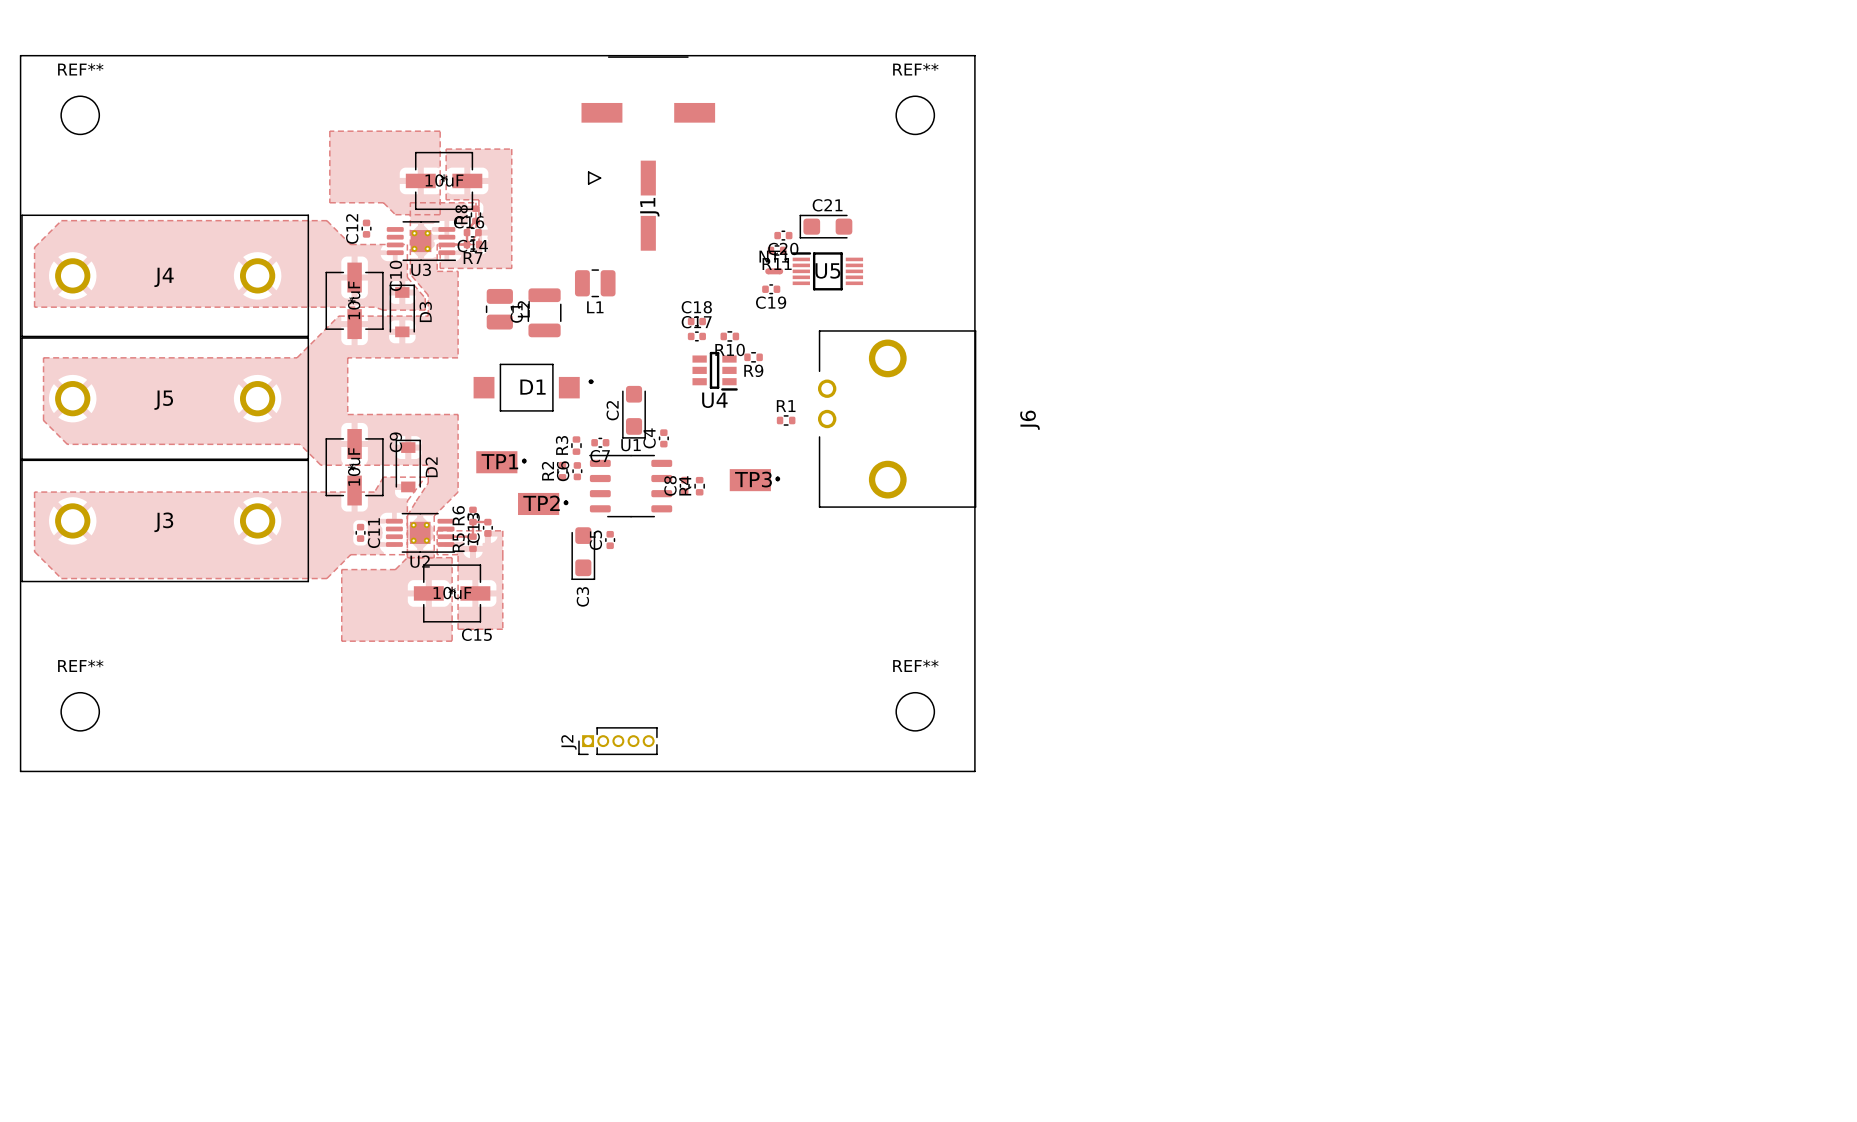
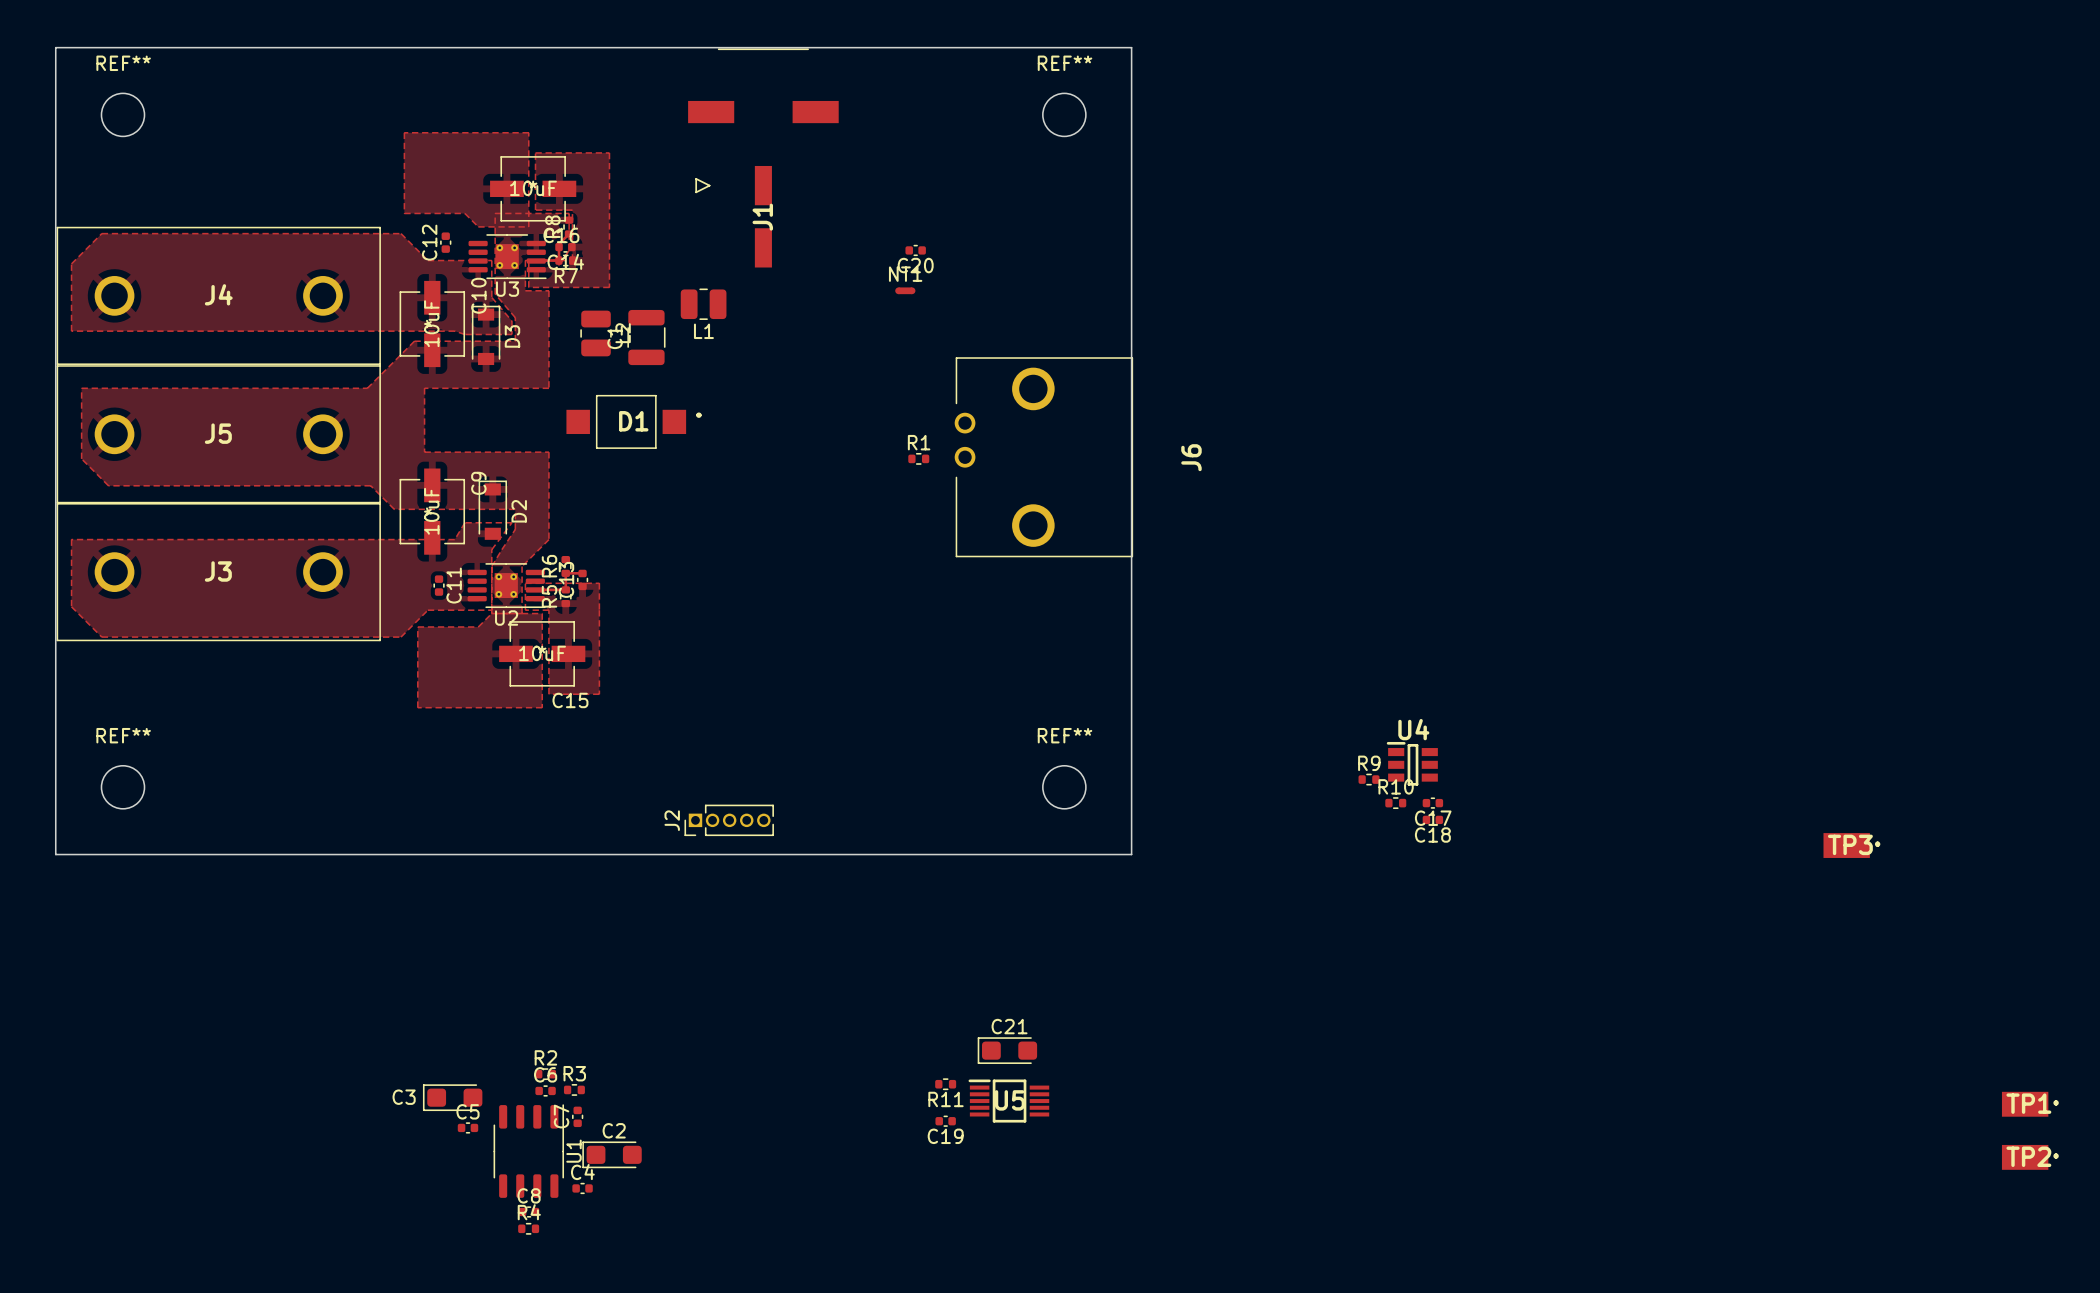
C21 position: (825, 226) -> (1007, 1050)
R11 position: (777, 250) -> (945, 1084)
U5 position: (827, 271) -> (1008, 1101)
C19 position: (771, 289) -> (945, 1121)
C18 name position: C18 (696, 307) -> C18 (1432, 835)
C18 position: (696, 321) -> (1432, 819)
C17 name position: C17 (696, 322) -> C17 (1433, 818)
C17 position: (696, 336) -> (1432, 803)
R10 position: (729, 336) -> (1395, 803)
R10 name position: R10 (730, 349) -> R10 (1396, 786)
R9 position: (753, 357) -> (1369, 779)
R9 name position: R9 (753, 370) -> R9 (1369, 763)
U4 rotation: 0° (715, 371) -> 180° (1412, 763)
U4 position: (715, 371) -> (1412, 763)
C2 rotation: 0° (634, 412) -> 90° clockwise (612, 1154)
C2 position: (634, 412) -> (612, 1154)
C4 rotation: 0° (663, 438) -> 90° clockwise (582, 1188)
C4 position: (663, 438) -> (582, 1188)
C7 rotation: 0° (600, 442) -> 90° clockwise (577, 1116)
C7 position: (600, 442) -> (577, 1116)
R3 rotation: 0° (576, 445) -> 90° clockwise (574, 1089)
R3 position: (576, 445) -> (574, 1089)
TP1 position: (501, 462) -> (2030, 1104)
R2 rotation: 0° (562, 471) -> 90° clockwise (545, 1074)
R2 position: (562, 471) -> (545, 1074)
C6 rotation: 0° (577, 471) -> 90° clockwise (545, 1090)
C6 position: (577, 471) -> (545, 1090)
TP3 position: (754, 480) -> (1851, 845)
C8 rotation: 0° (684, 485) -> 90° clockwise (529, 1211)
C8 position: (684, 485) -> (529, 1211)
U1 rotation: 0° (630, 486) -> 90° clockwise (528, 1151)
U1 position: (630, 486) -> (528, 1151)
R4 rotation: 0° (699, 486) -> 90° clockwise (528, 1228)
R4 position: (699, 486) -> (528, 1228)
TP2 position: (543, 503) -> (2030, 1157)
C5 rotation: 0° (610, 540) -> 90° clockwise (467, 1127)
C5 position: (610, 540) -> (467, 1127)
C3 rotation: 0° (583, 553) -> 90° clockwise (452, 1097)
C3 position: (583, 553) -> (452, 1097)

